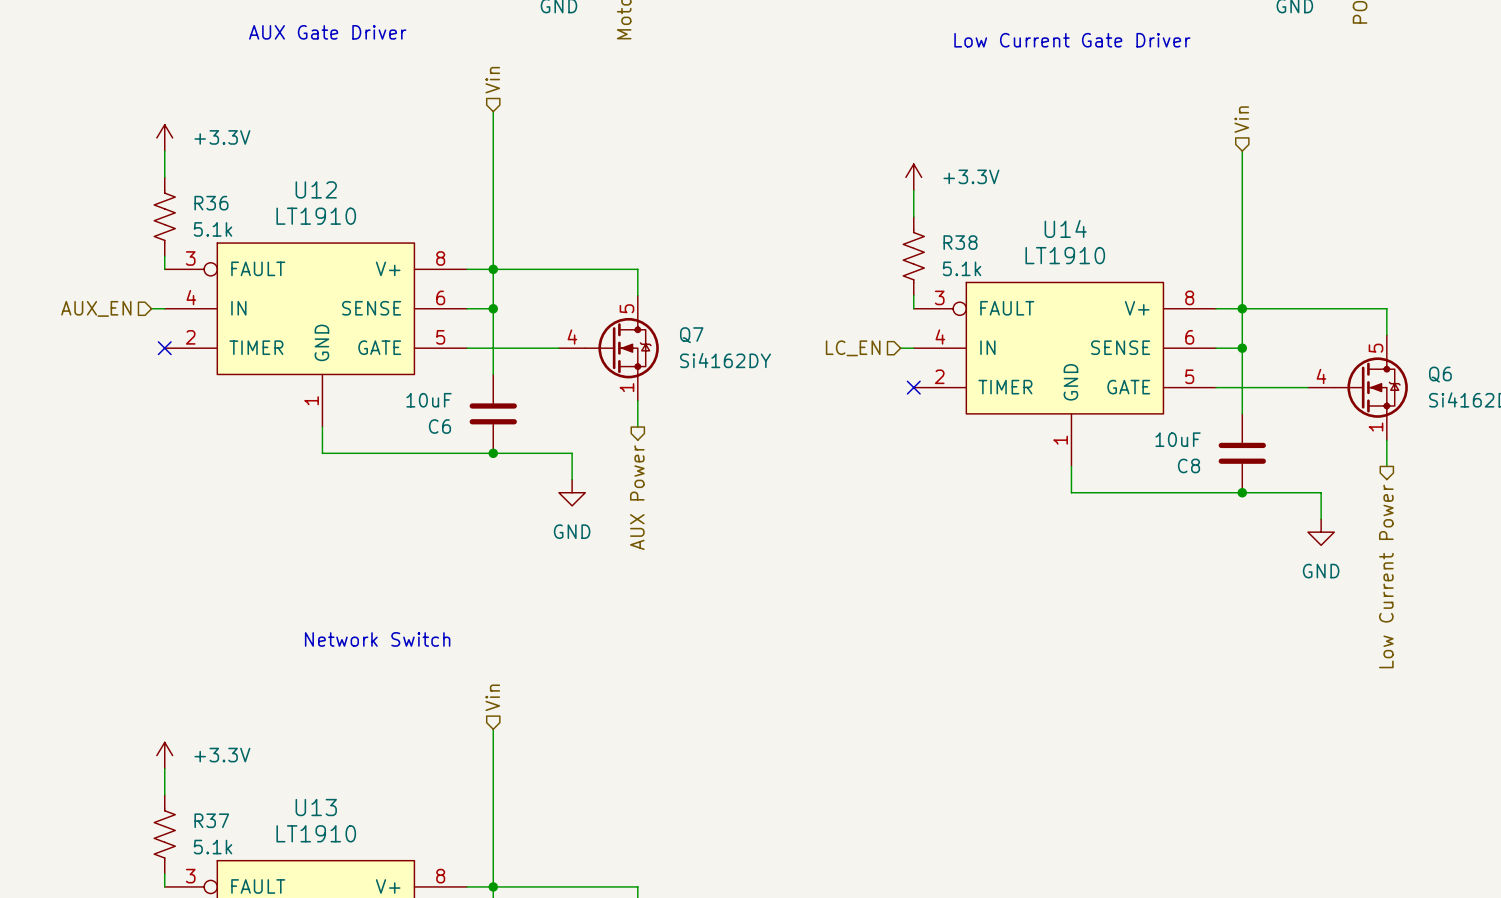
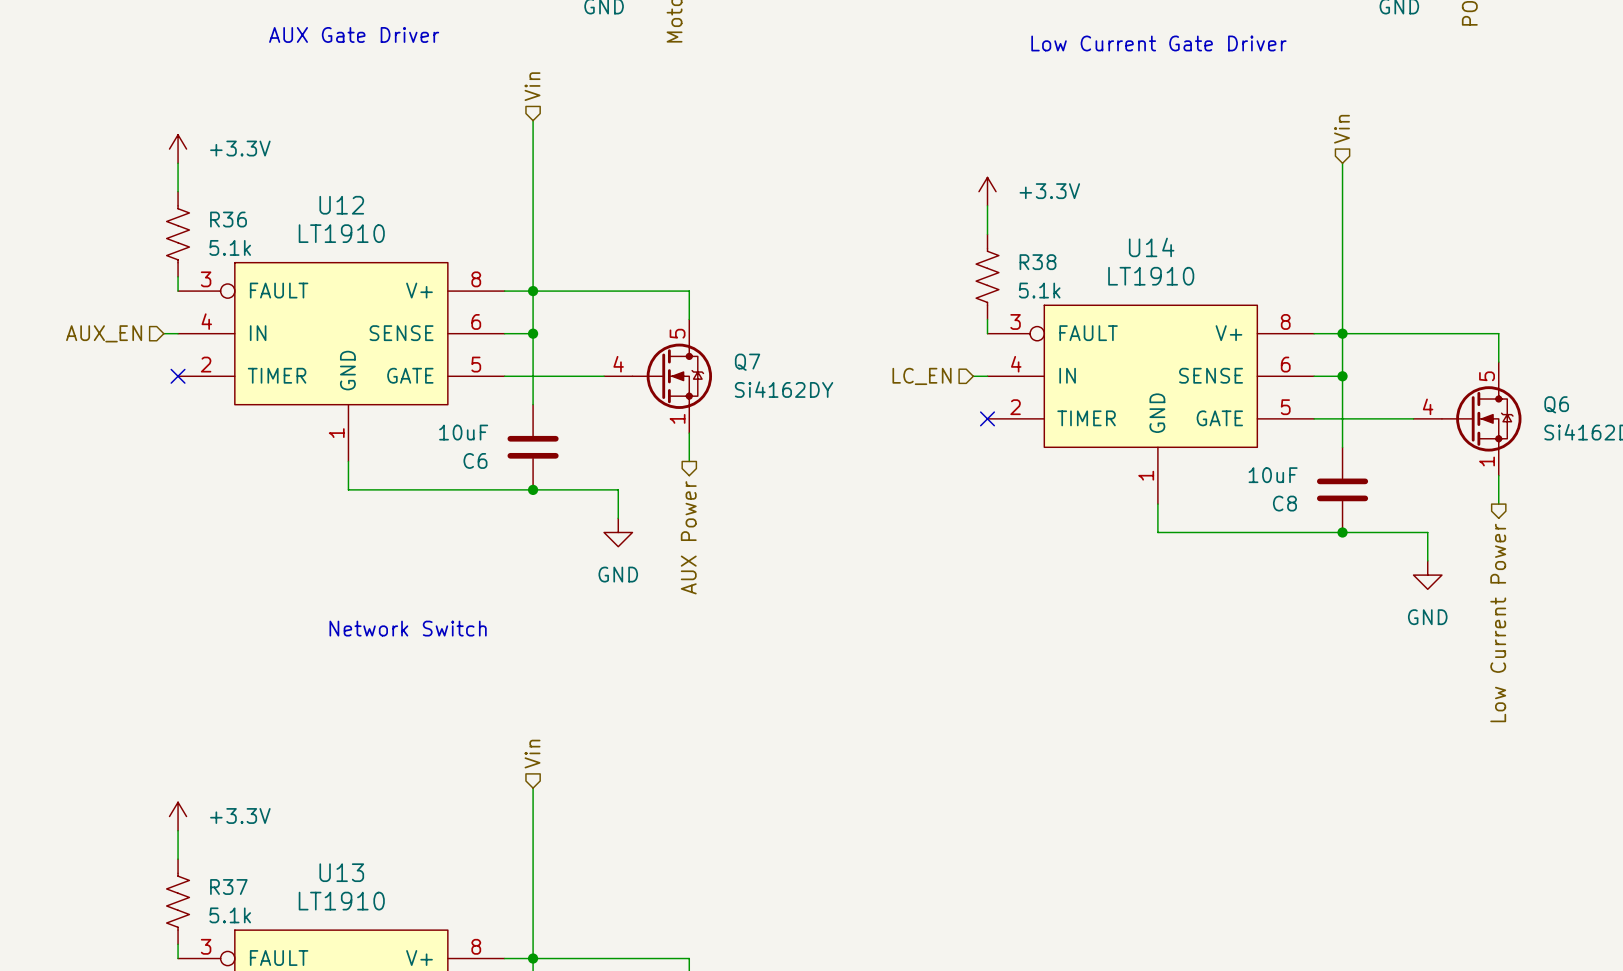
text position: Network Switch (377, 639) -> Network Switch (408, 628)

